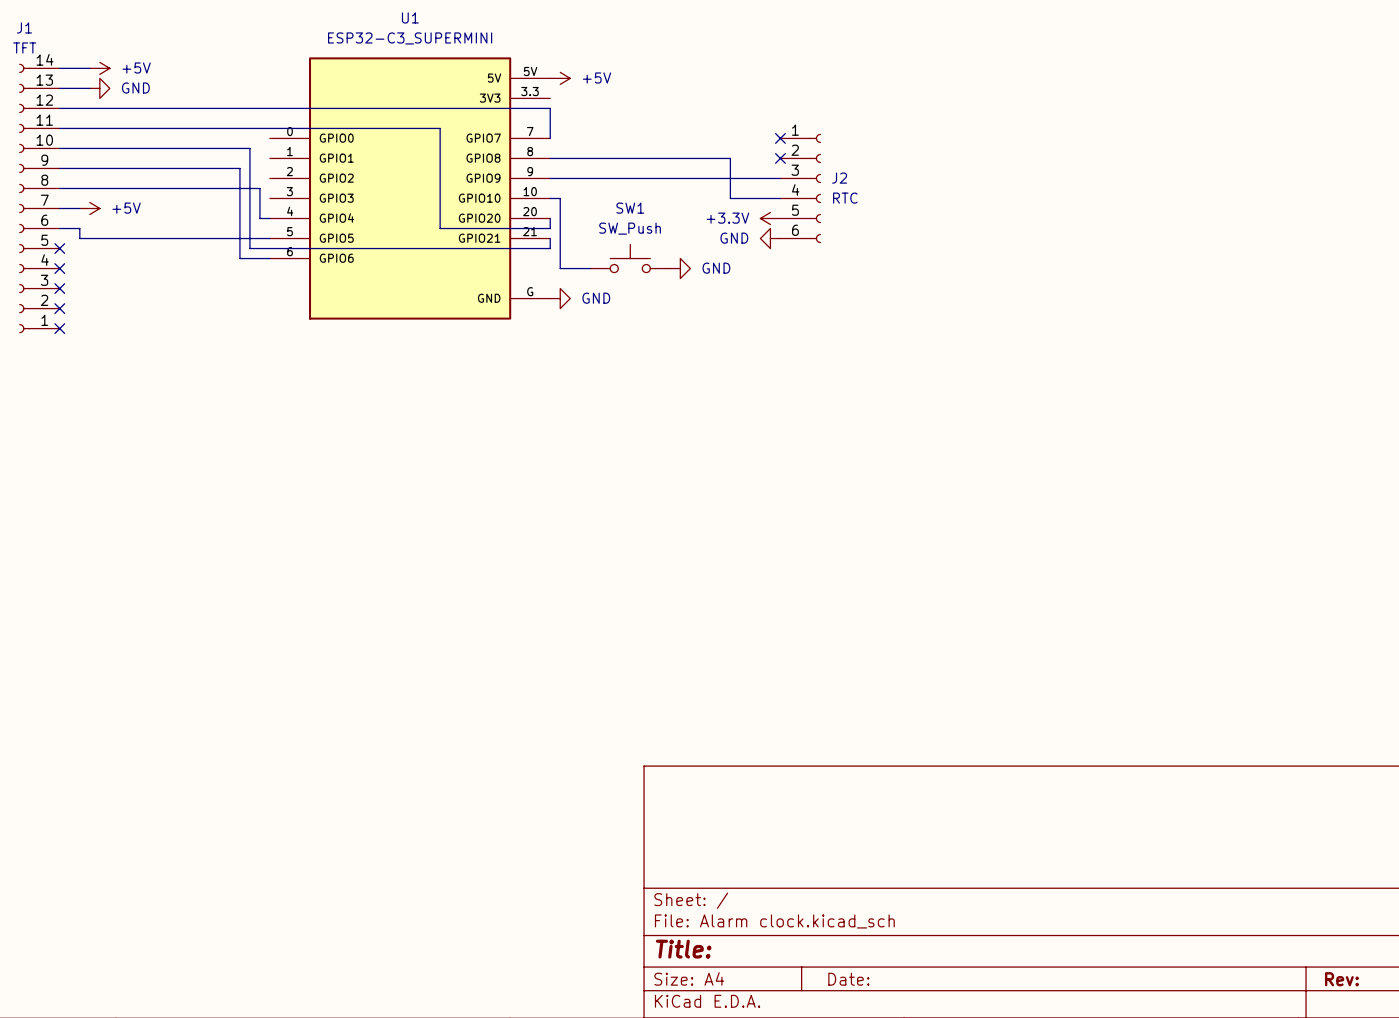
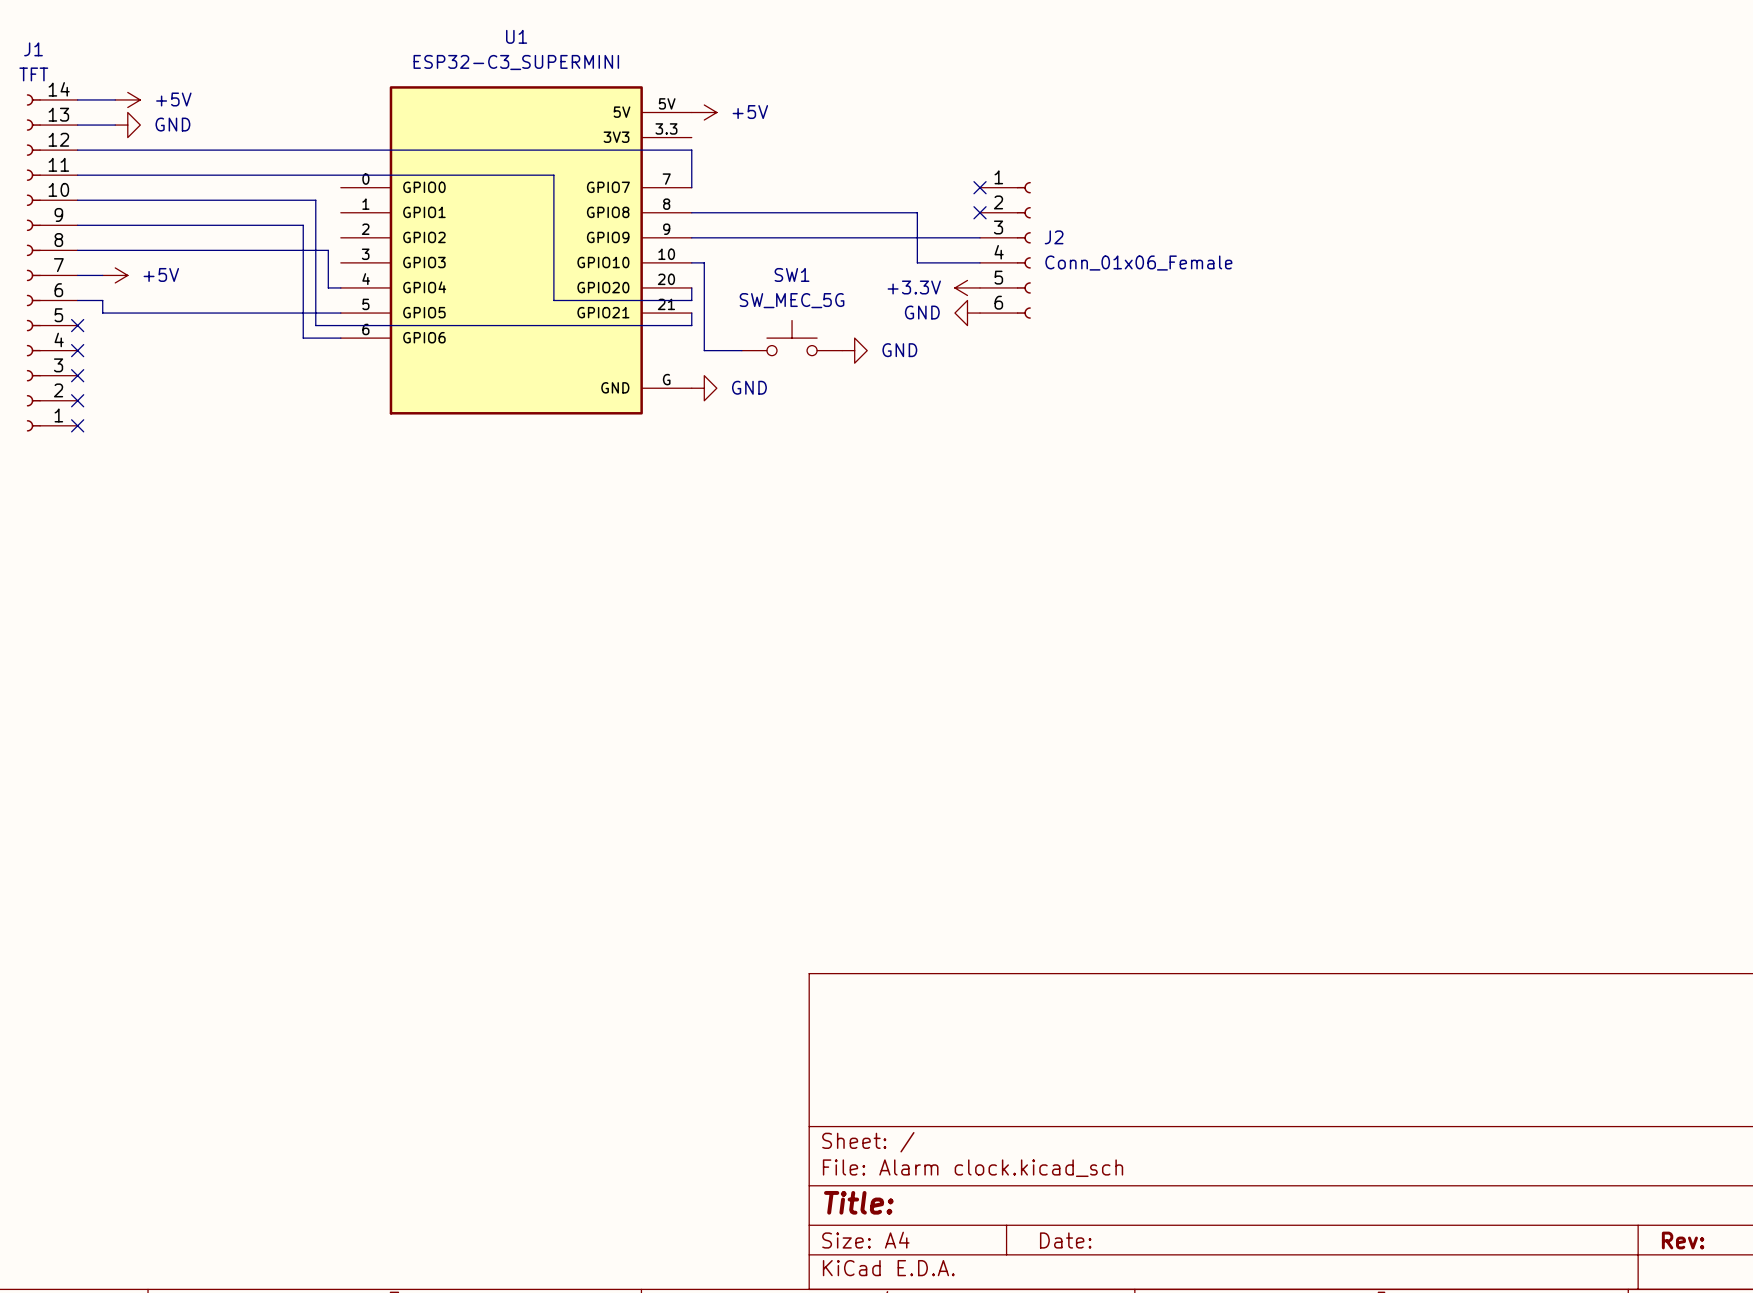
J2 value: RTC (845, 198) -> Conn_01x06_Female (1138, 263)
SW1 value: SW_Push (630, 228) -> SW_MEC_5G (792, 300)

